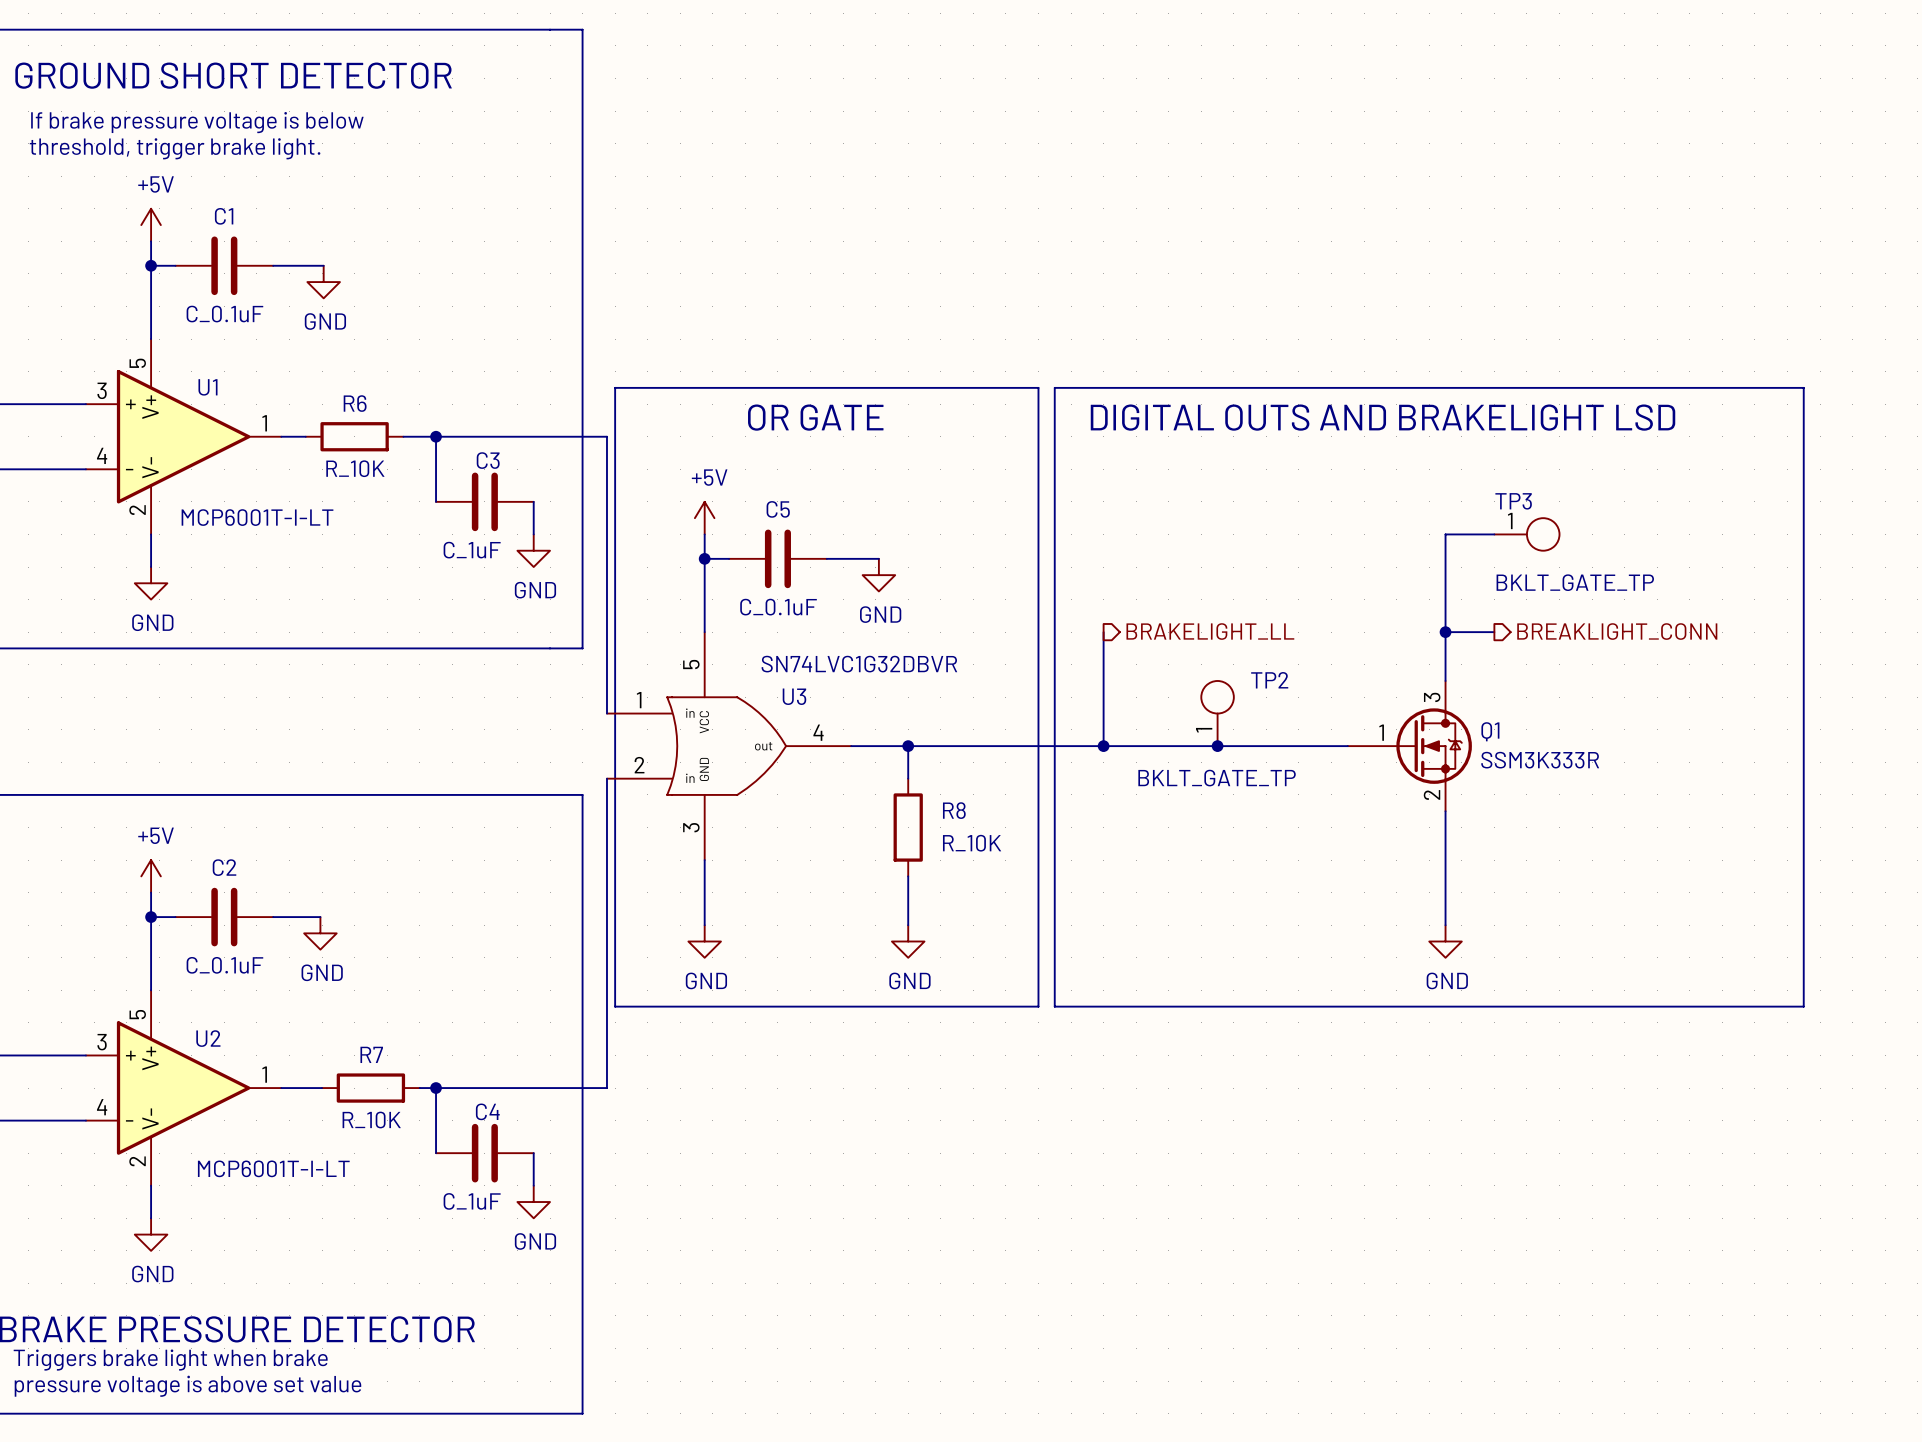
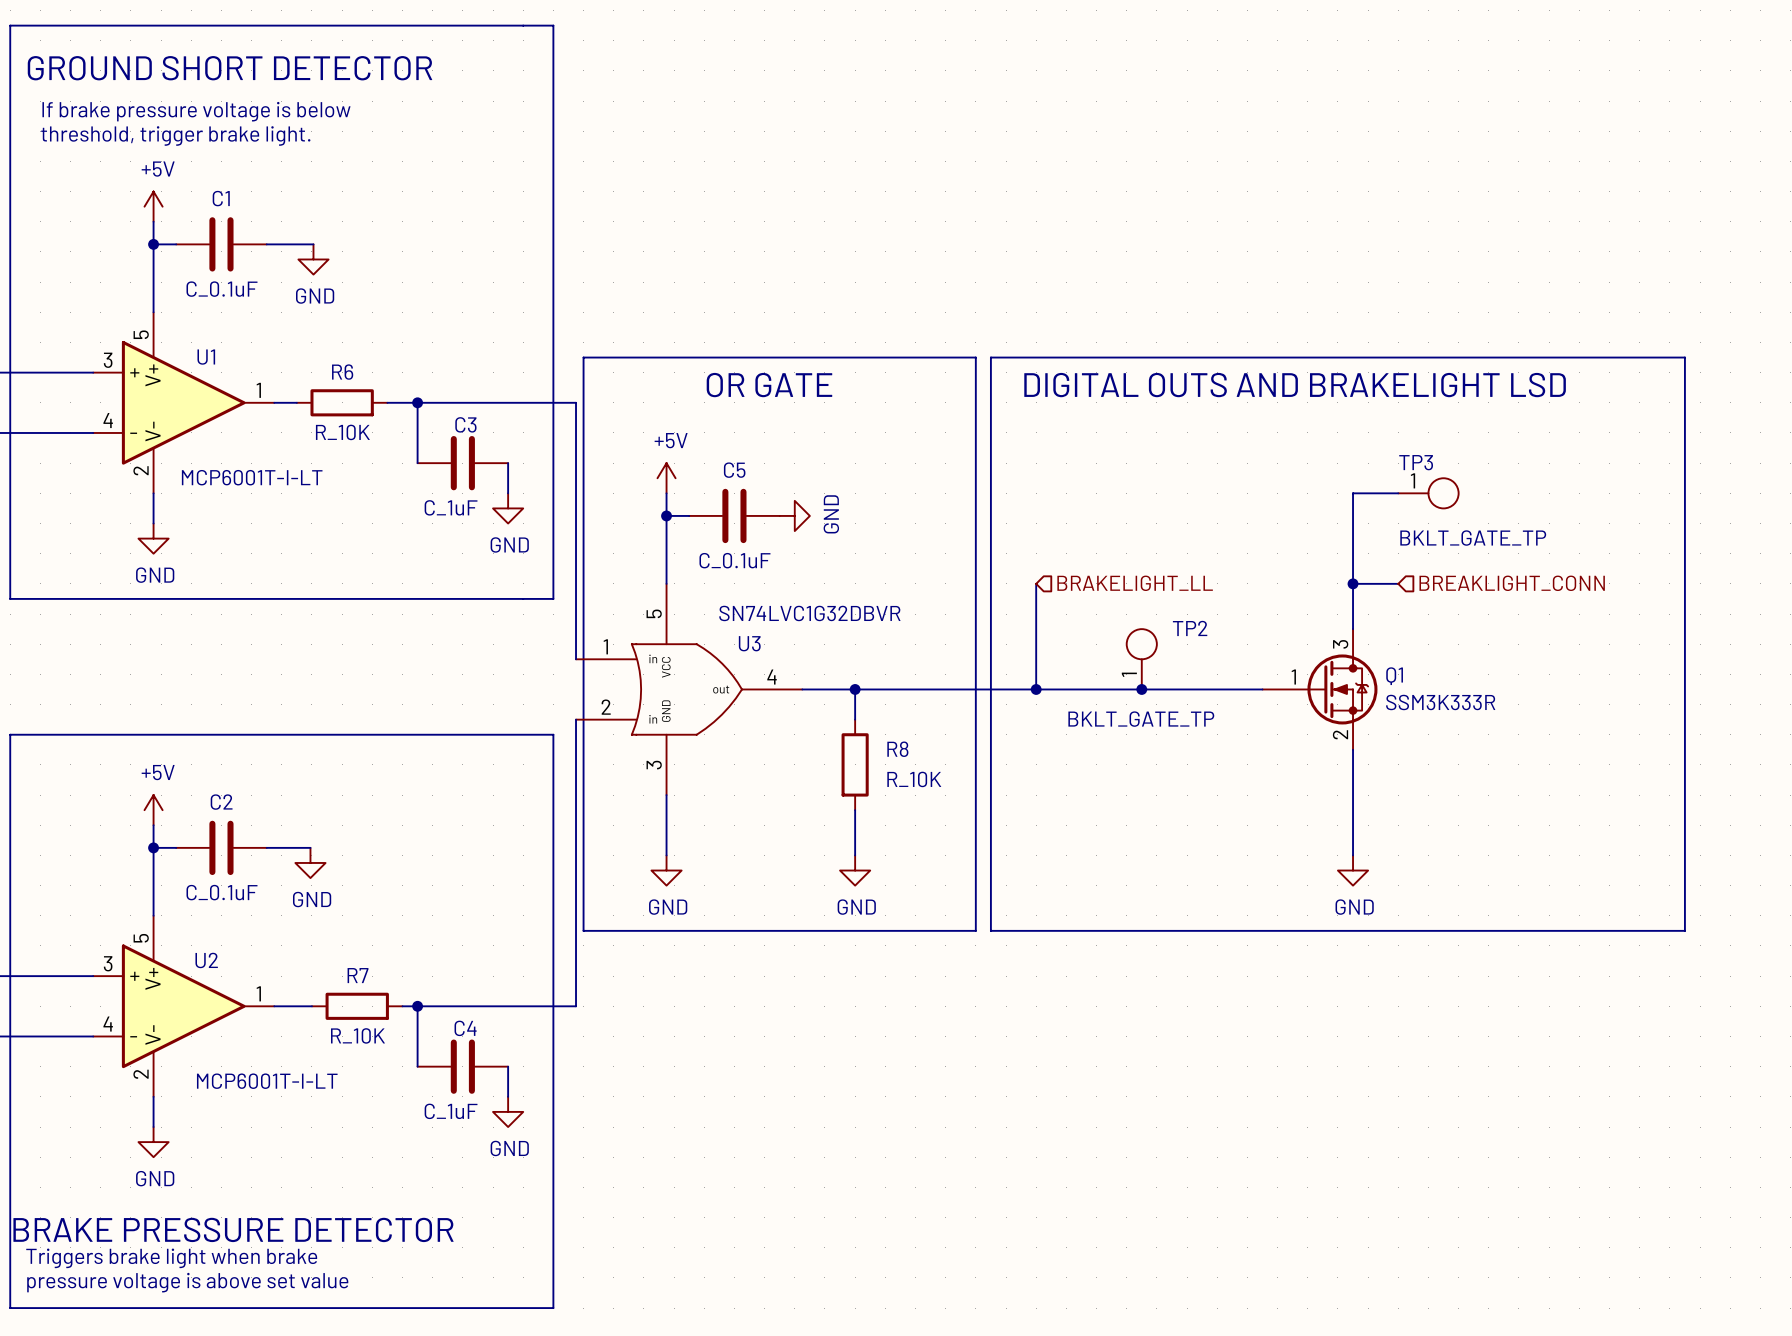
wire: (826, 558) (878, 558) -> none
power symbol rotation: 0° (878, 575) -> 90° counterclockwise (794, 515)
power symbol position: GND (878, 575) -> GND (794, 515)
hierarchical label shape: output (1210, 631) -> input (1135, 583)
hierarchical label shape: output (1617, 631) -> input (1512, 583)

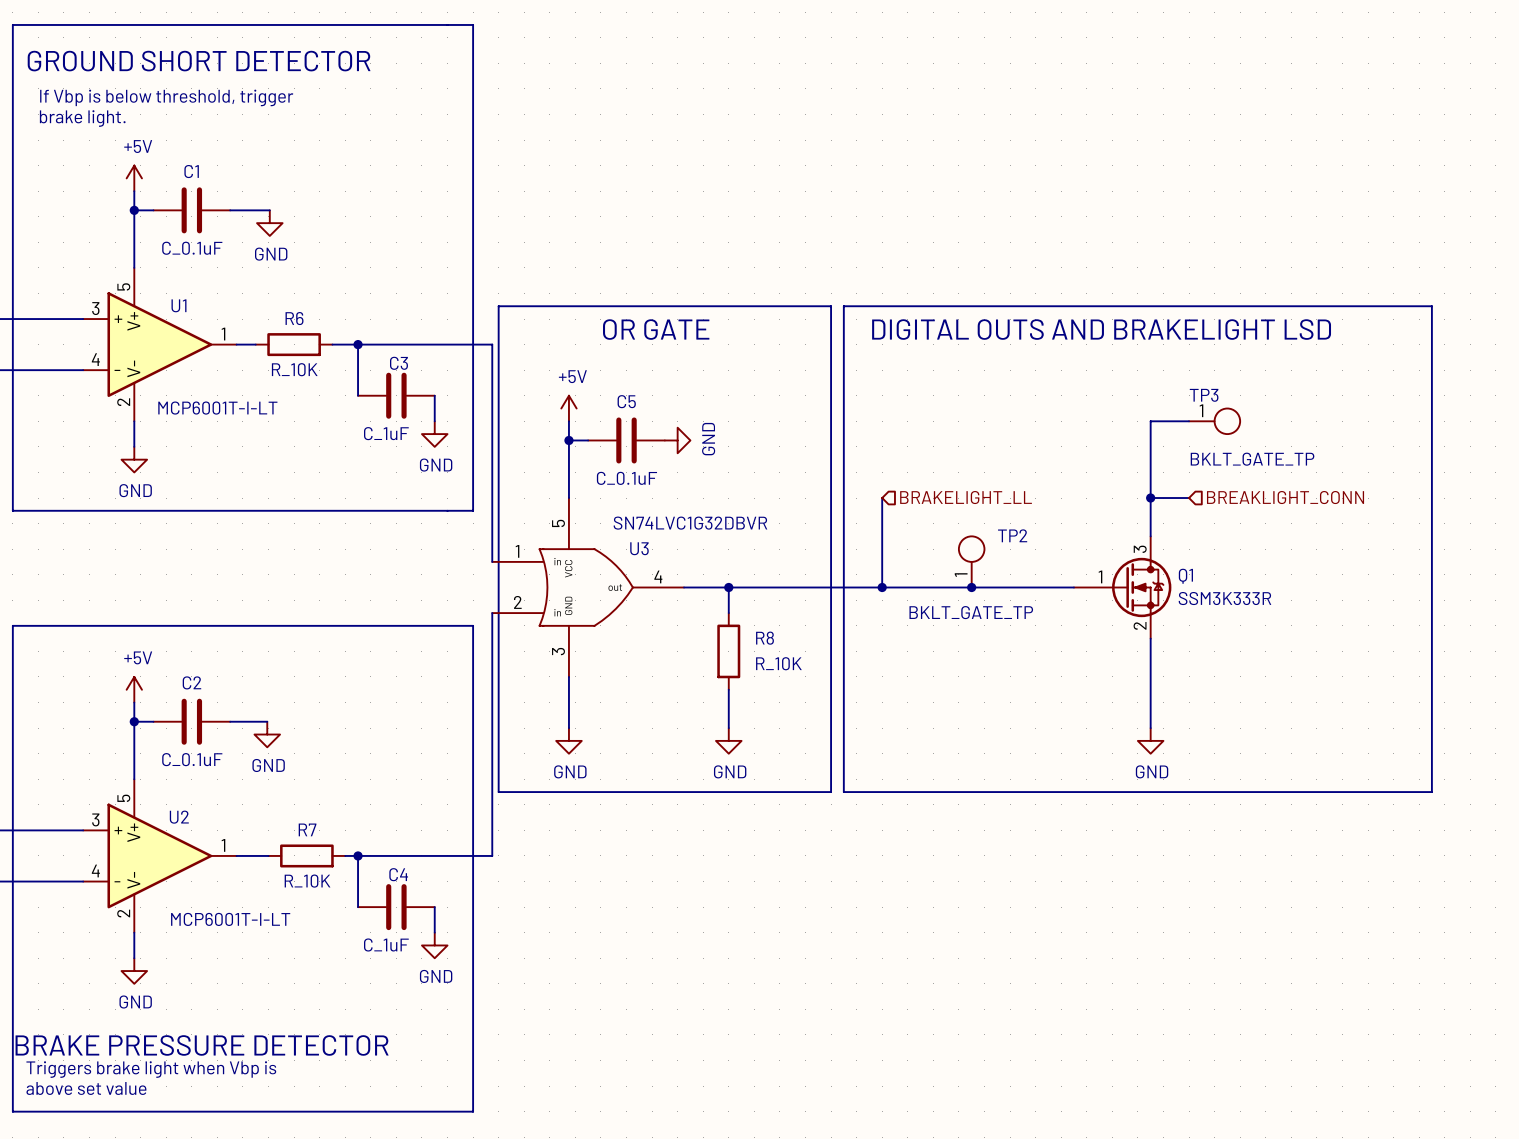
text: If brake pressure voltage is below (196, 111) -> If Vbp is below threshold, trigger (166, 97)
text: threshold, trigger brake light. (175, 135) -> brake light. (82, 118)
text: Triggers brake light when brake (171, 1258) -> Triggers brake light when Vbp is (151, 1069)
text: pressure voltage is above set value (187, 1282) -> above set value (86, 1088)

